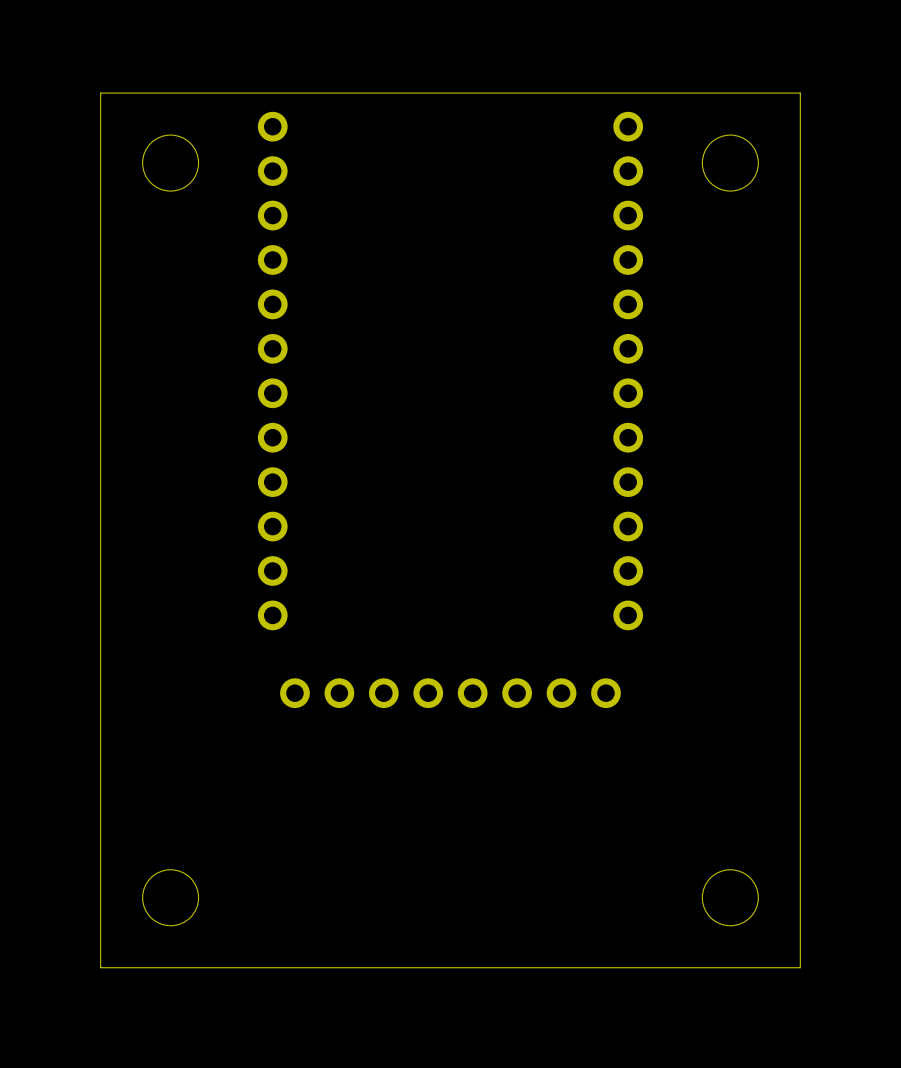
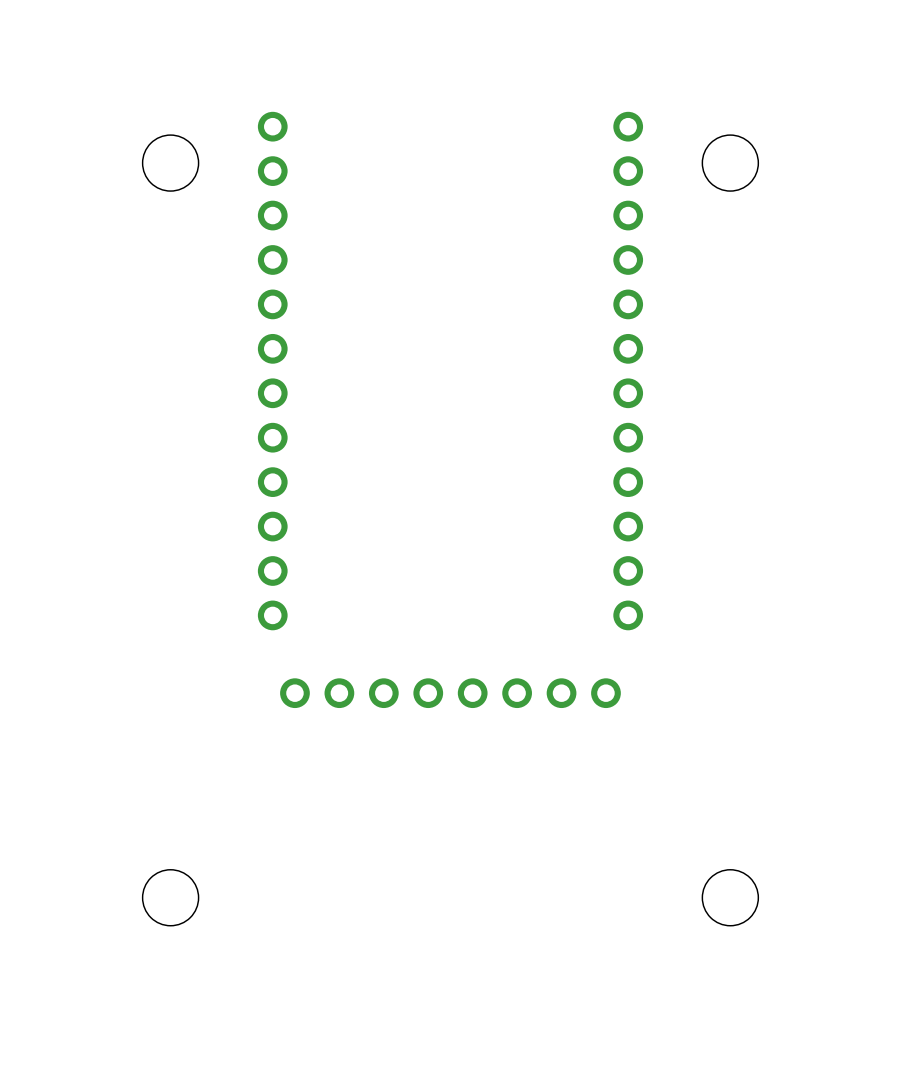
board edge: (800, 93) (100, 93) (100, 967) (800, 967) (800, 93) -> none

